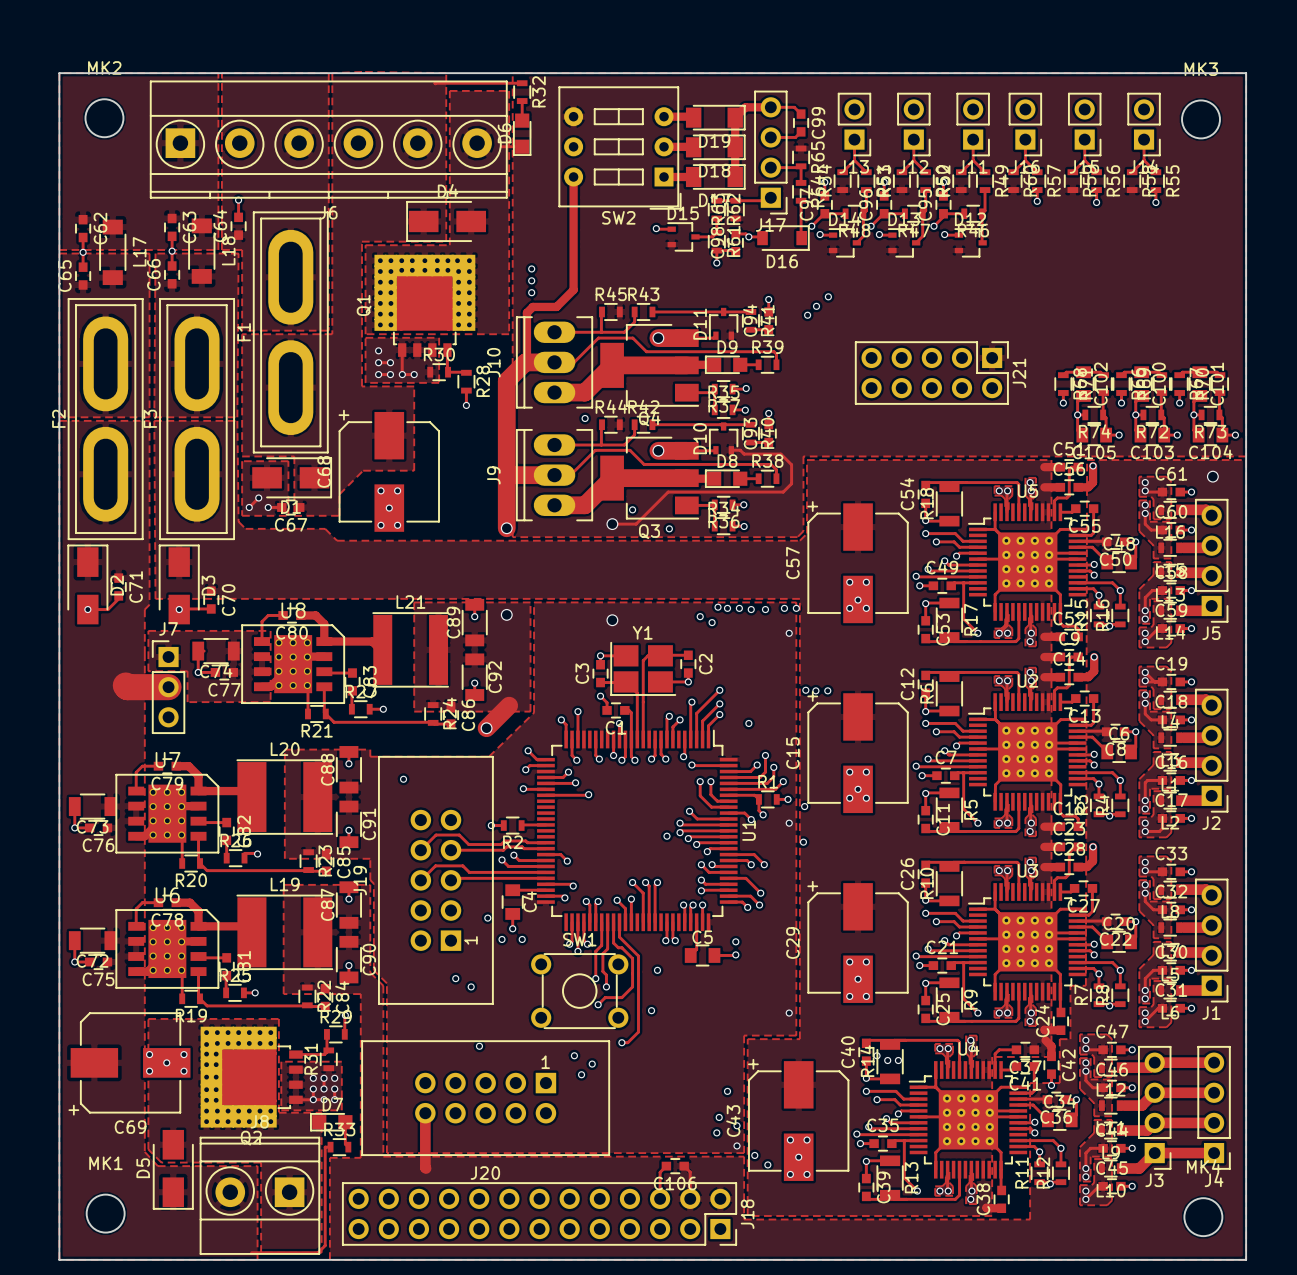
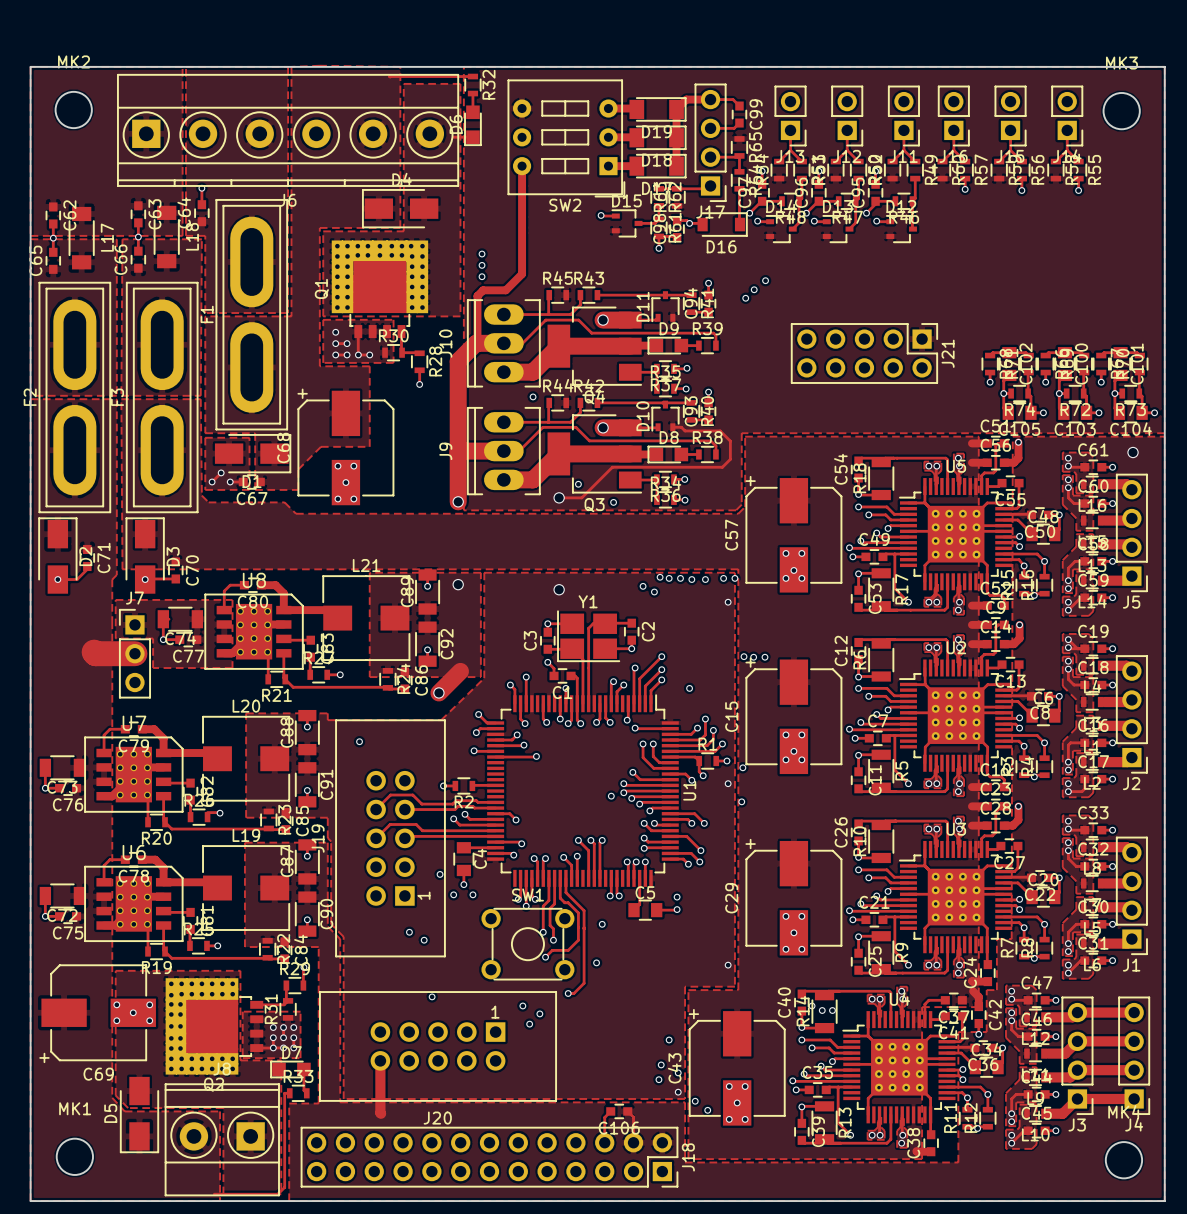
L21 footprint: [372, 612, 449, 688] -> [322, 575, 411, 661]
L20 footprint: [236, 759, 334, 835] -> [202, 716, 290, 802]
L19 footprint: [236, 894, 334, 970] -> [202, 845, 290, 931]

